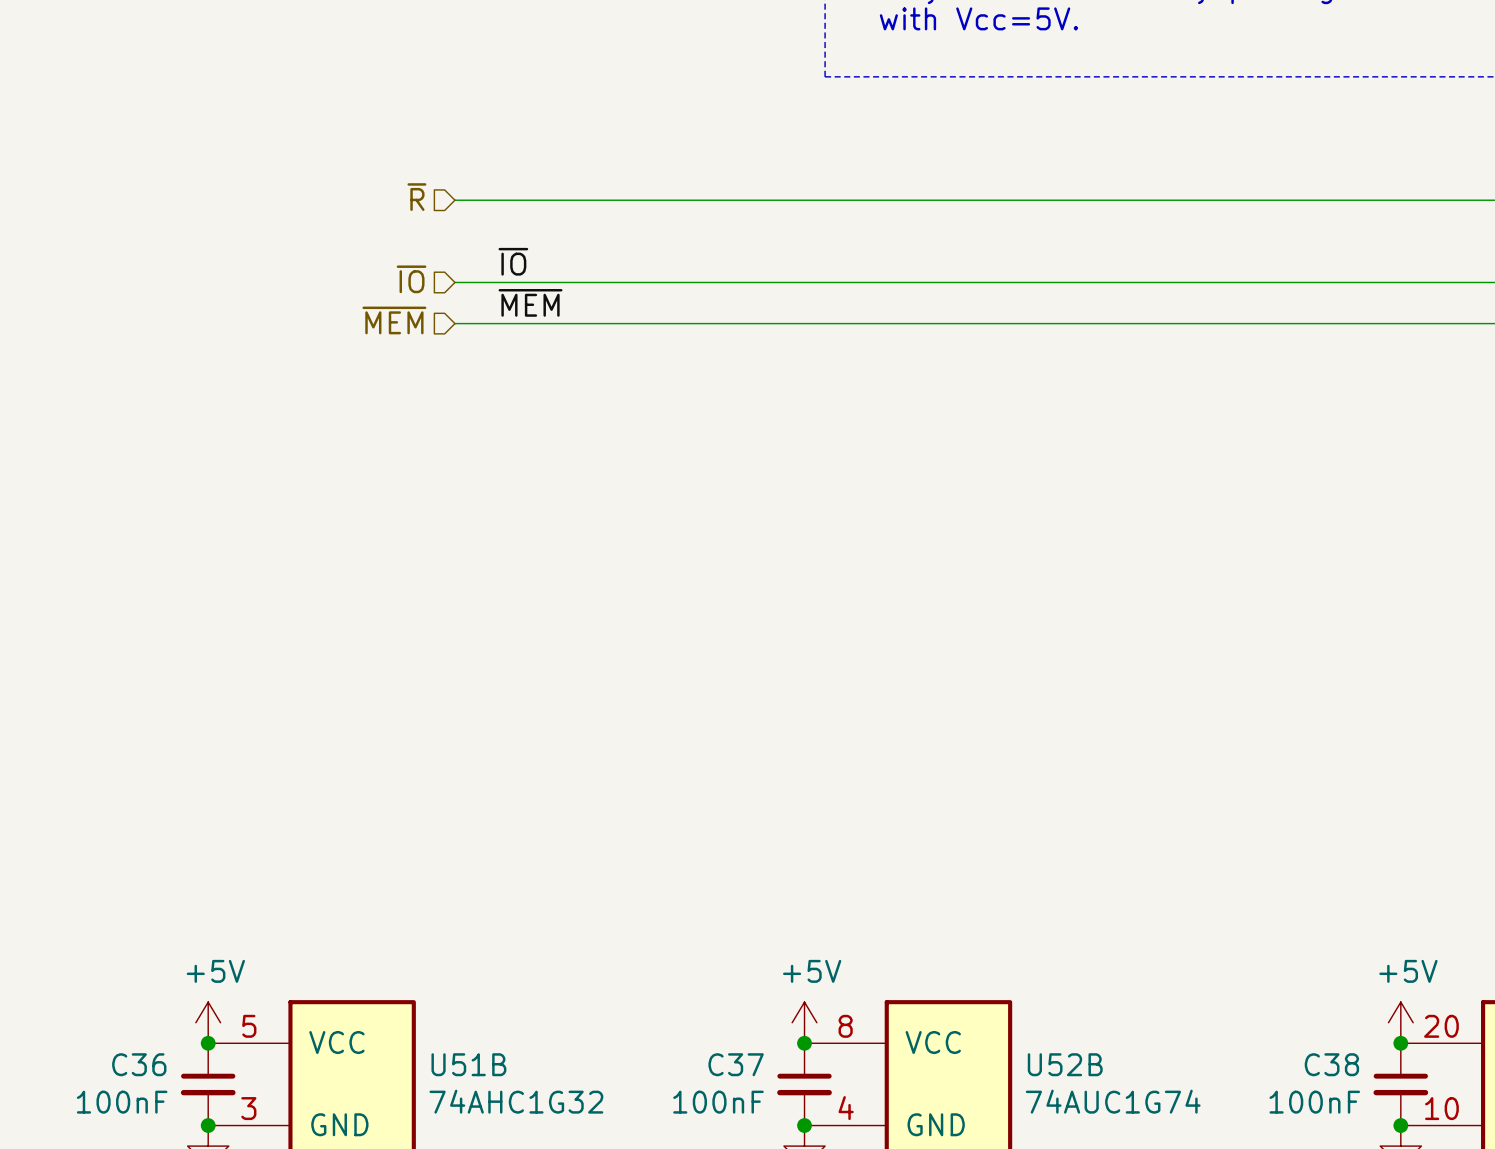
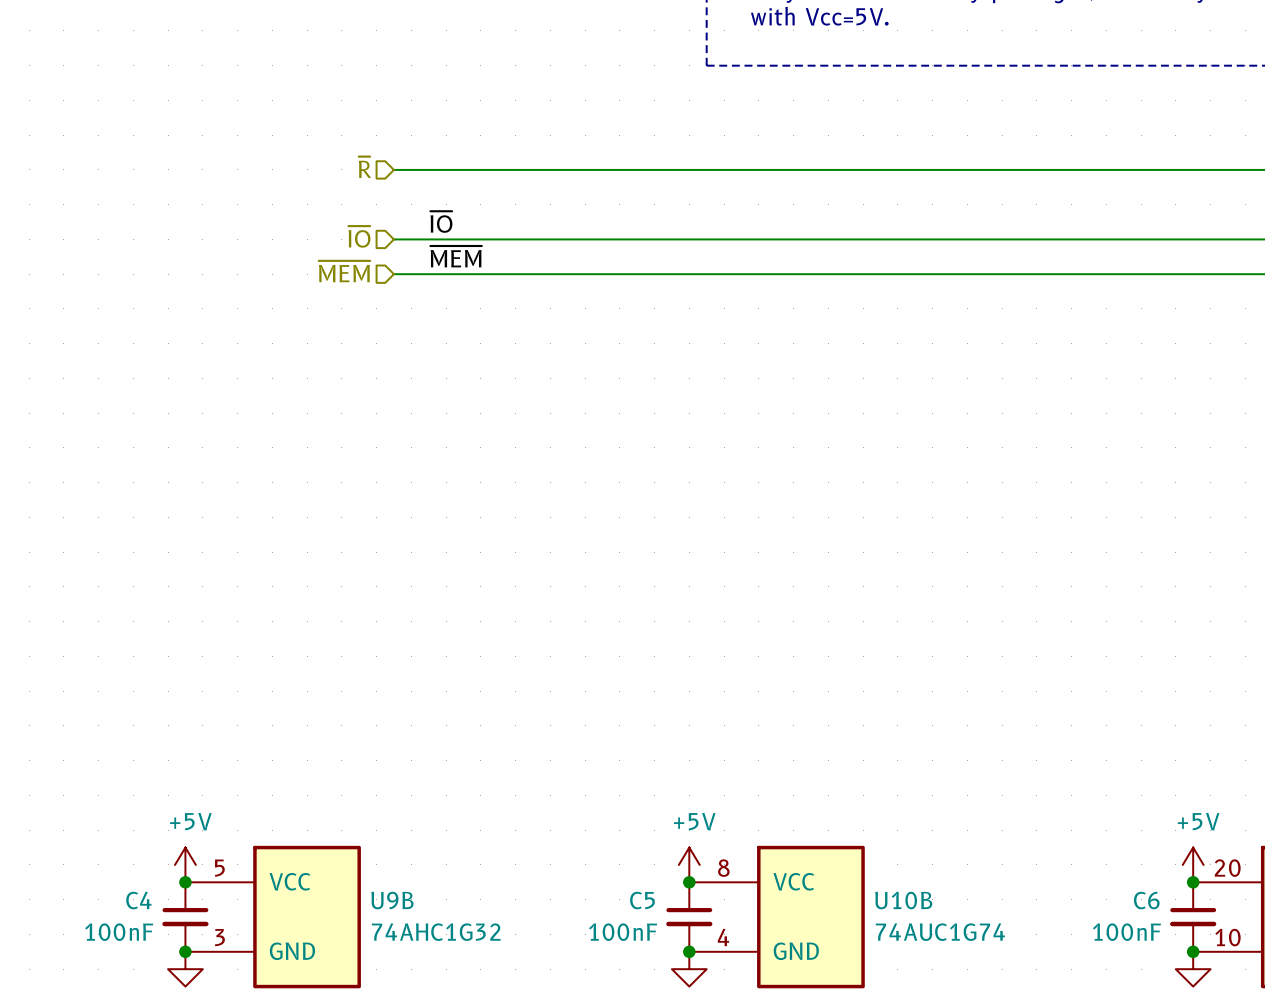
C36 name: C36 (139, 1064) -> C4 (138, 900)
U51B name: U51B (468, 1064) -> U9B (392, 900)
C37 name: C37 (736, 1064) -> C5 (642, 900)
U52B name: U52B (1065, 1064) -> U10B (903, 900)
C38 name: C38 (1331, 1064) -> C6 (1146, 900)

